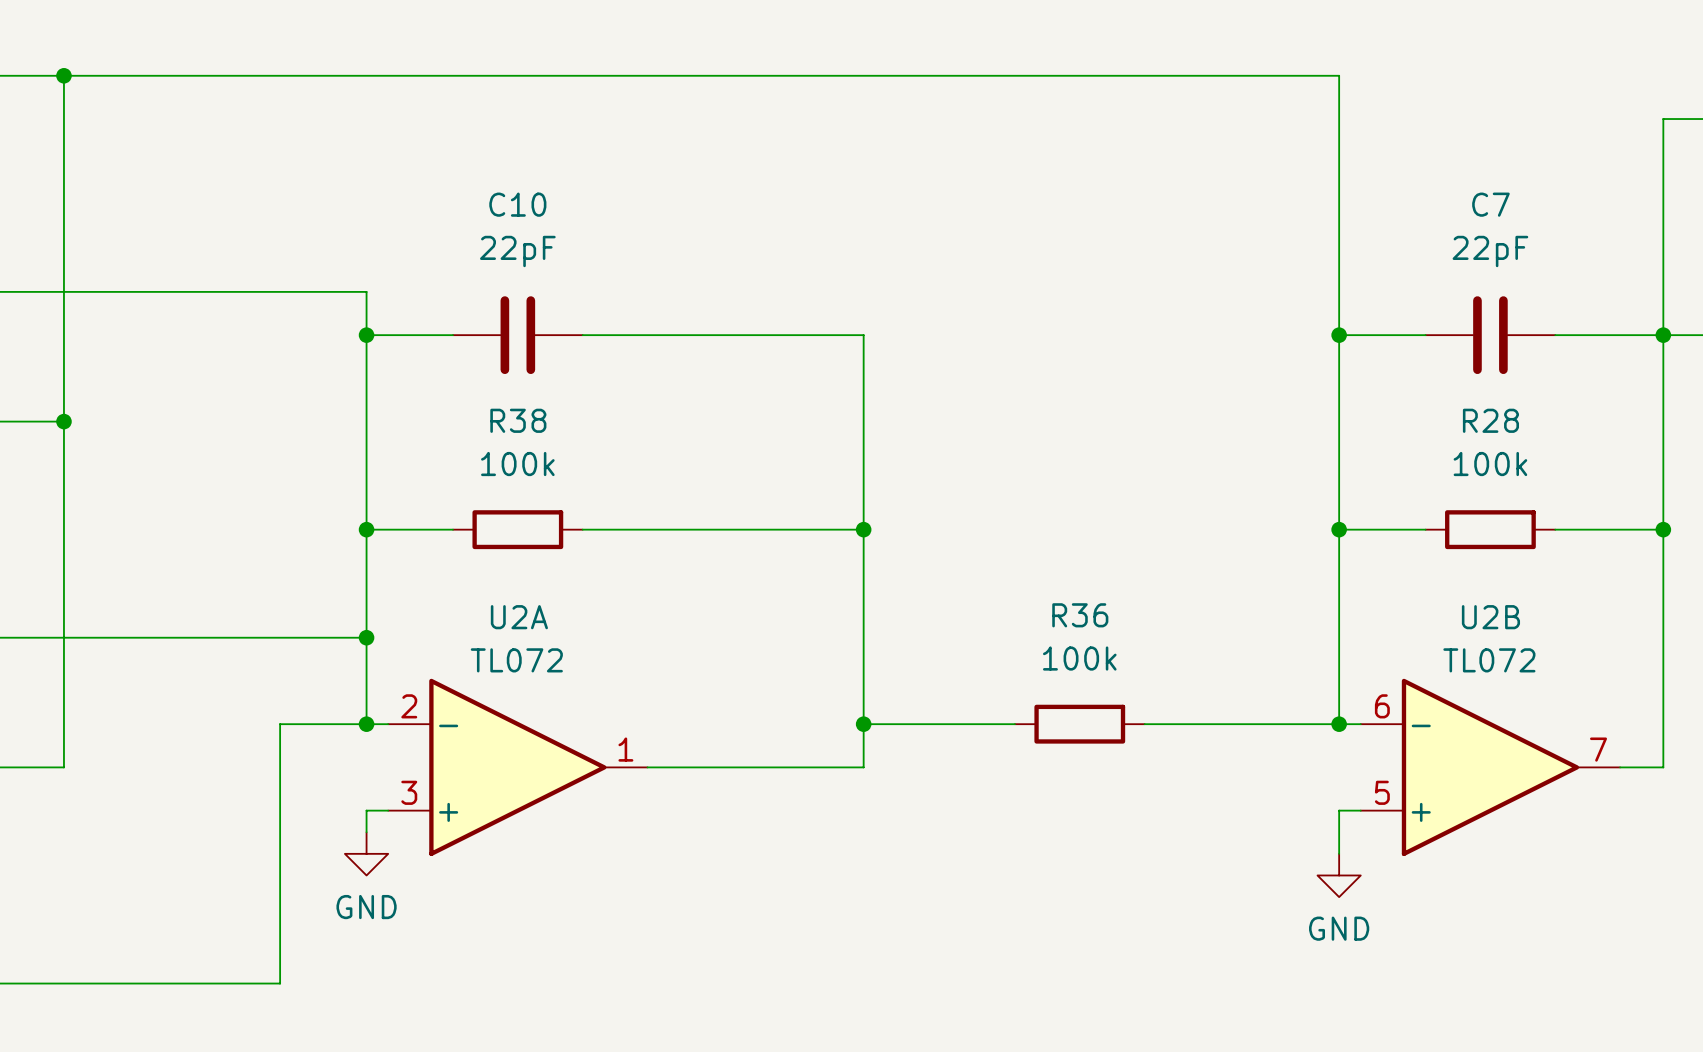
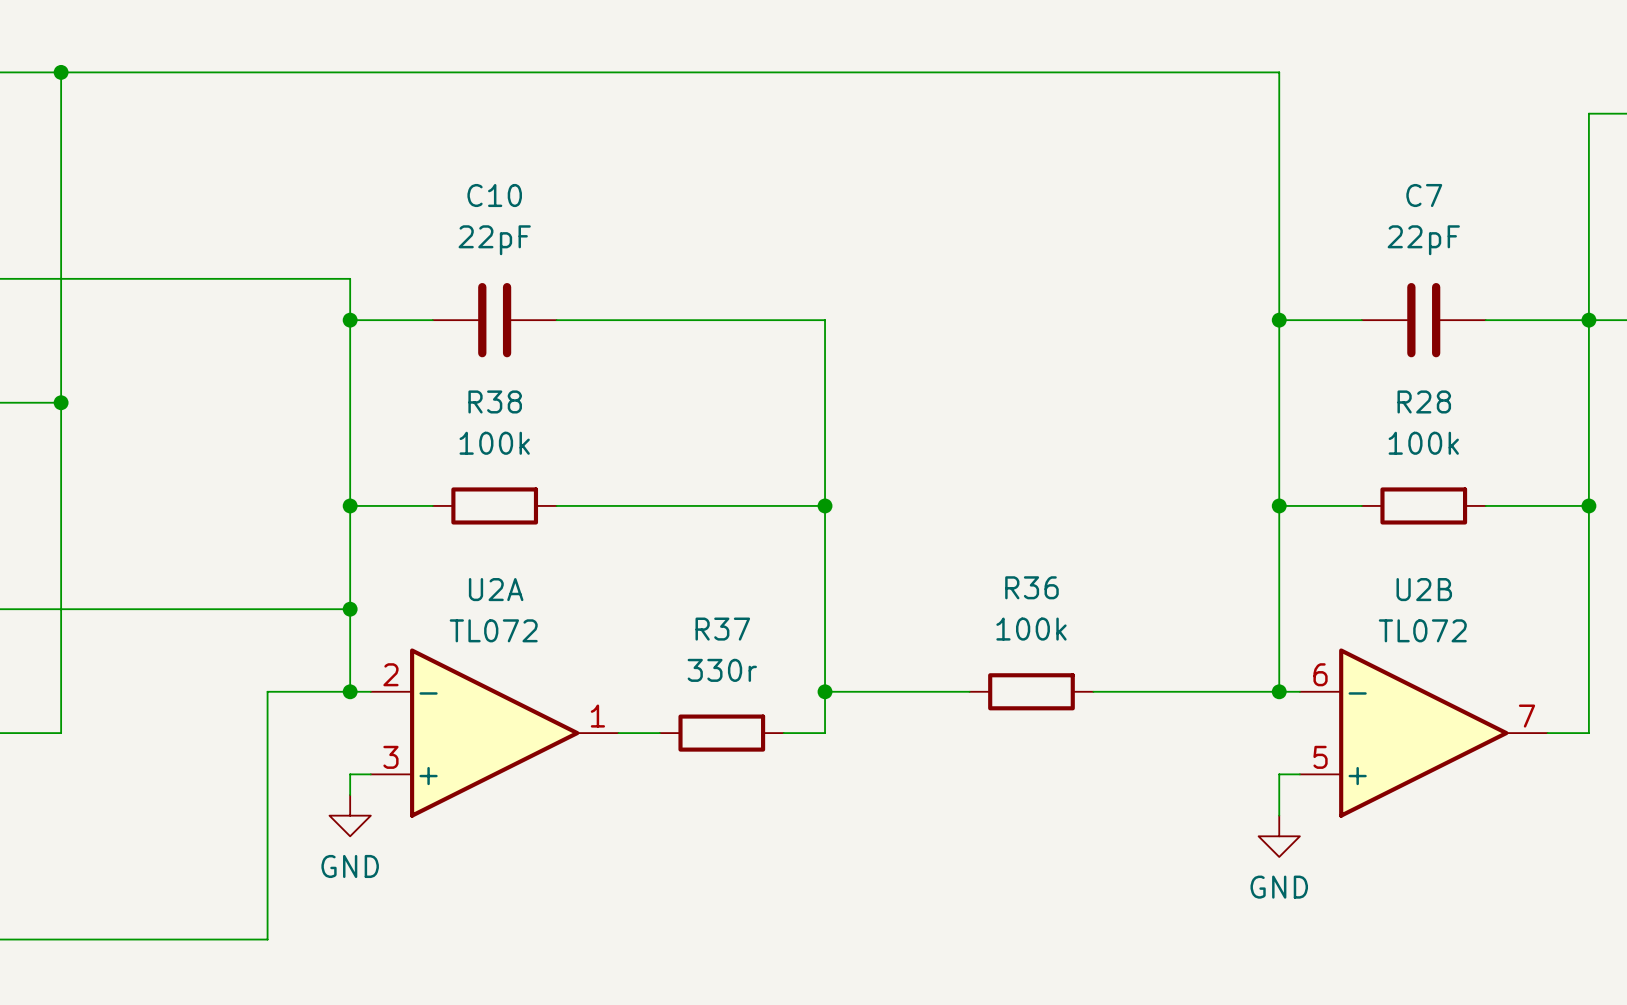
wire: (690, 767) (820, 767) -> none
R37: none -> 330r (721, 733)

